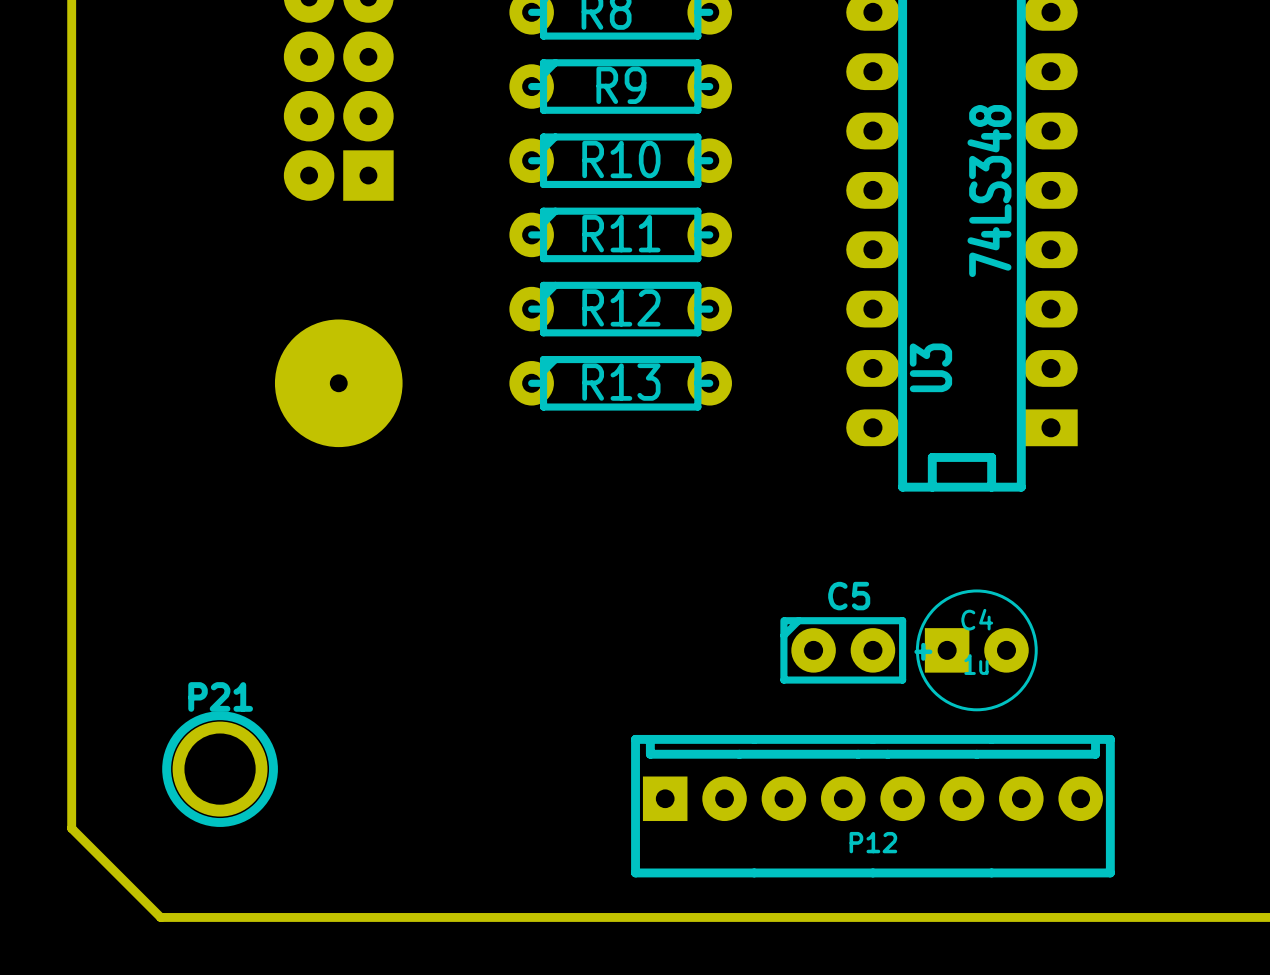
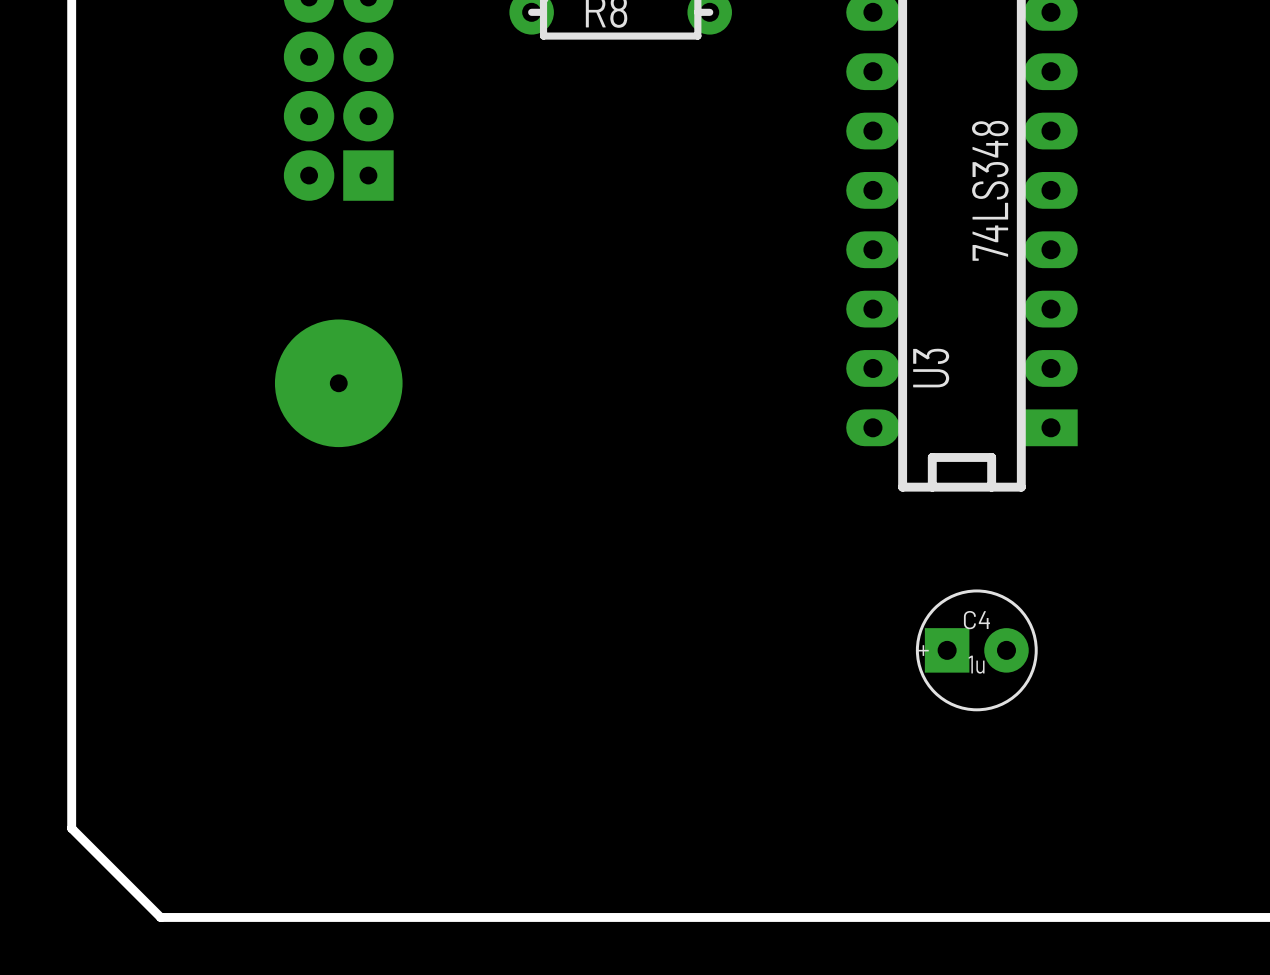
R9: (620, 86) -> none
R10: (620, 160) -> none
R11: (620, 234) -> none
R12: (620, 309) -> none
R13: (620, 383) -> none
C5: (843, 650) -> none
P21: (220, 769) -> none
P12: (872, 806) -> none

